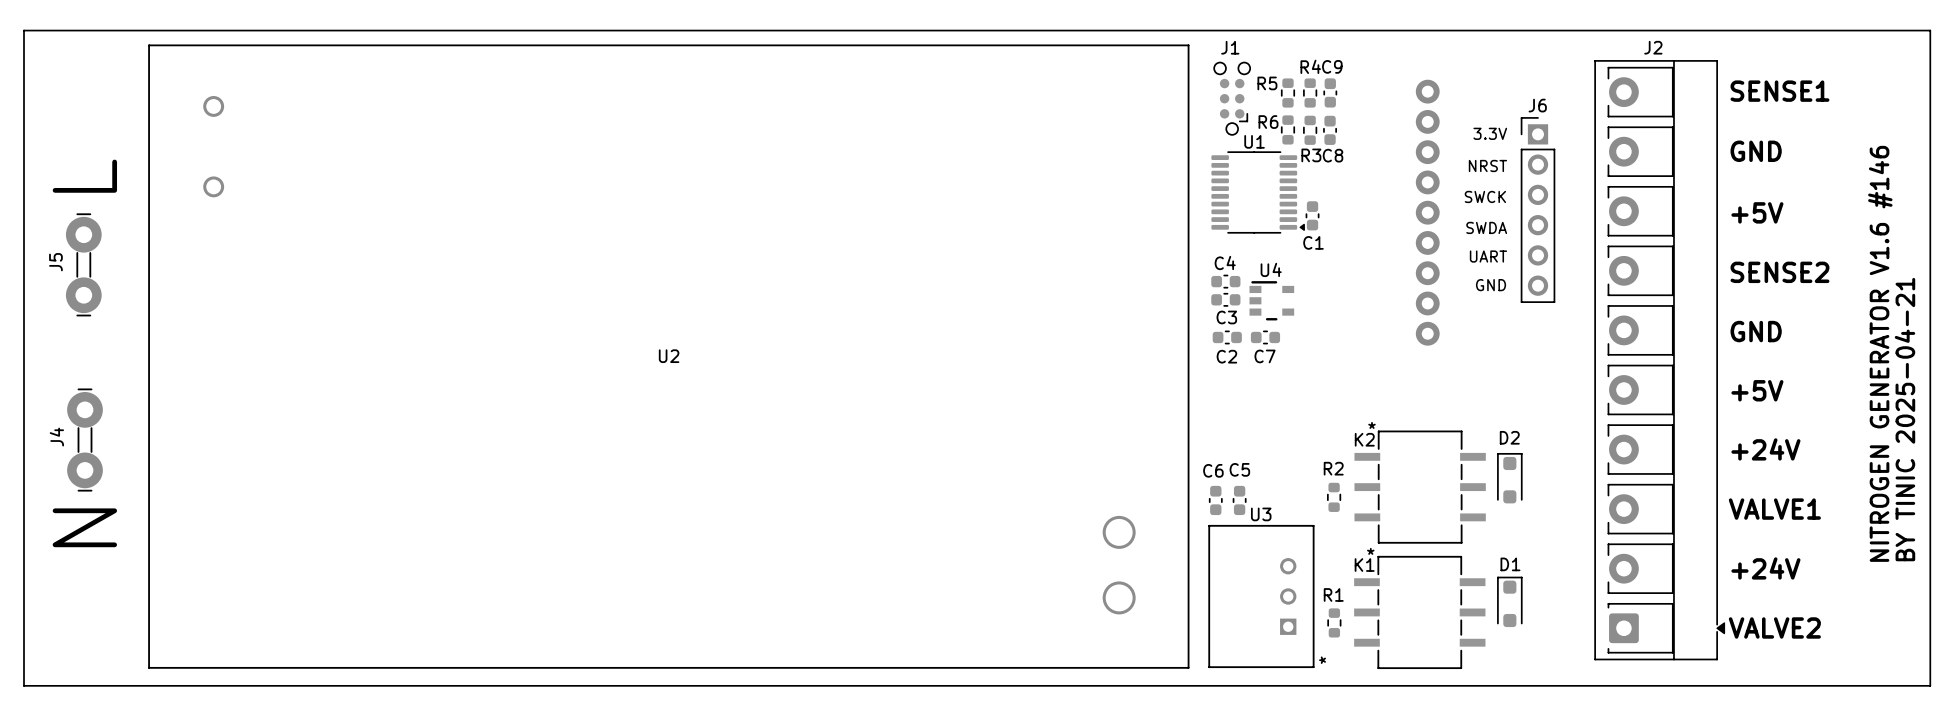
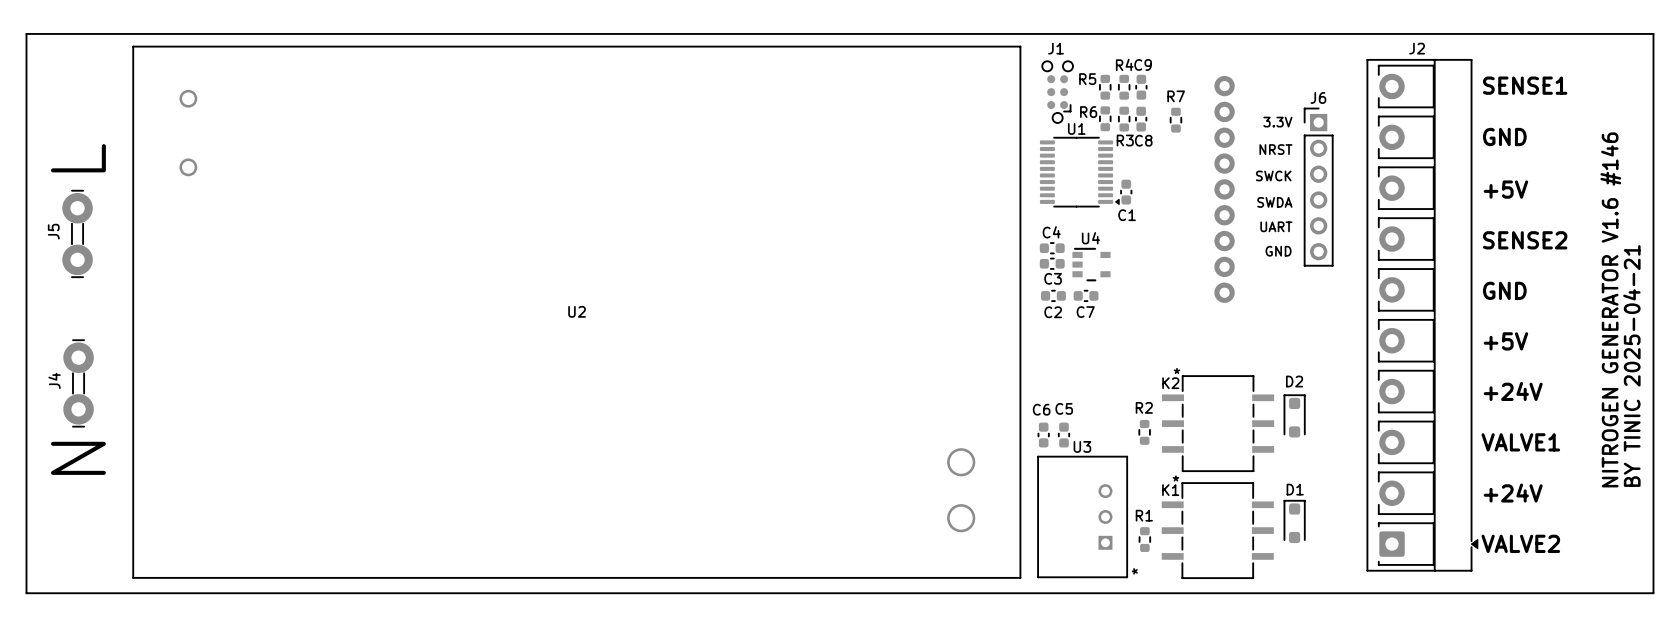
R7: none -> (1175, 120)

